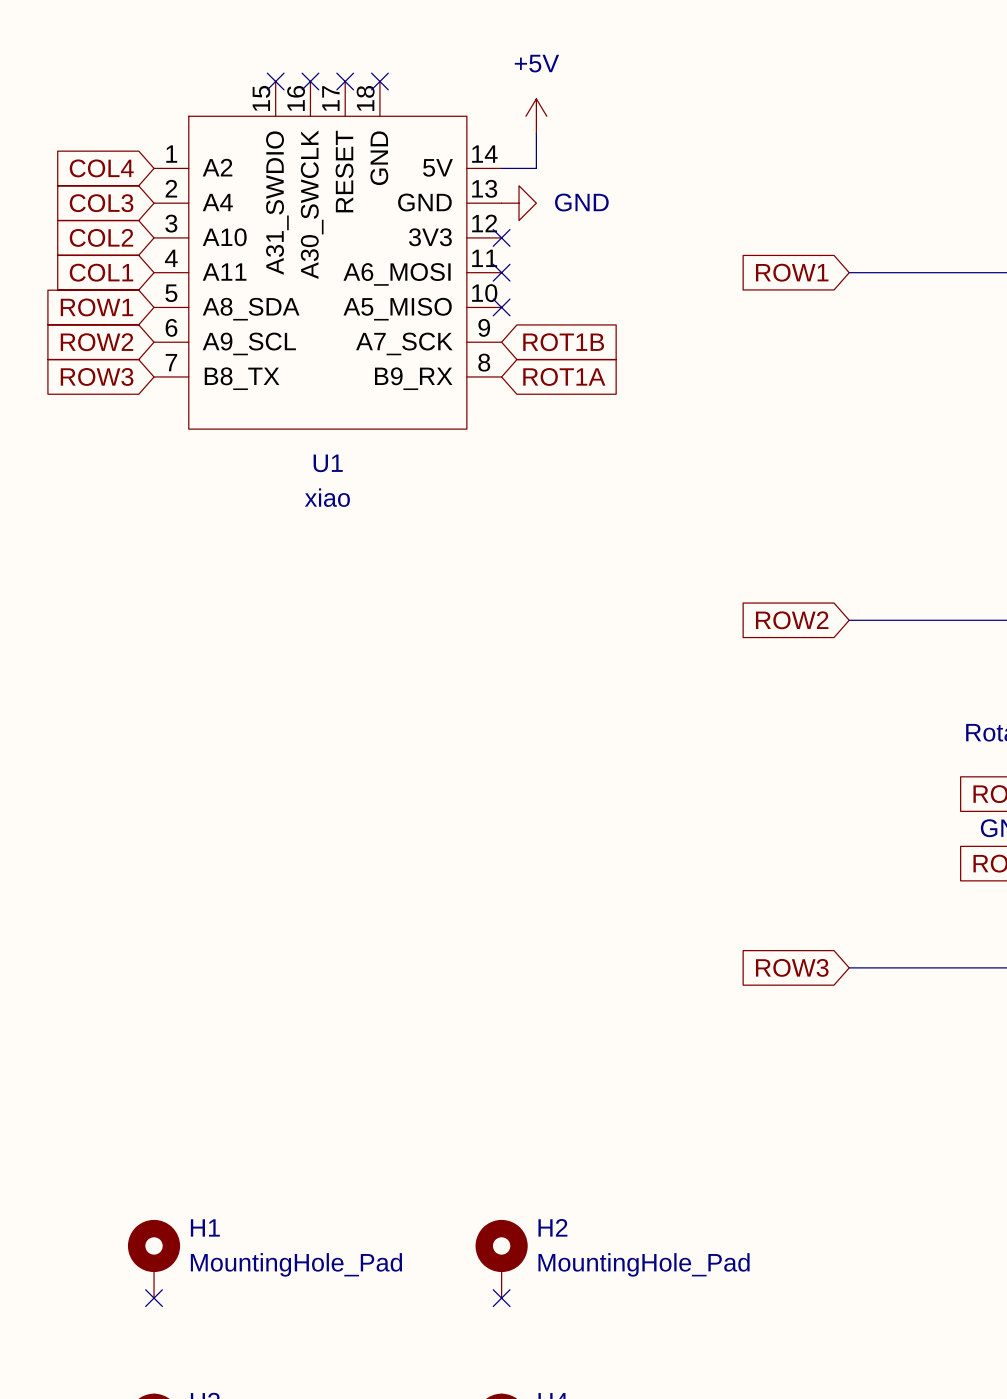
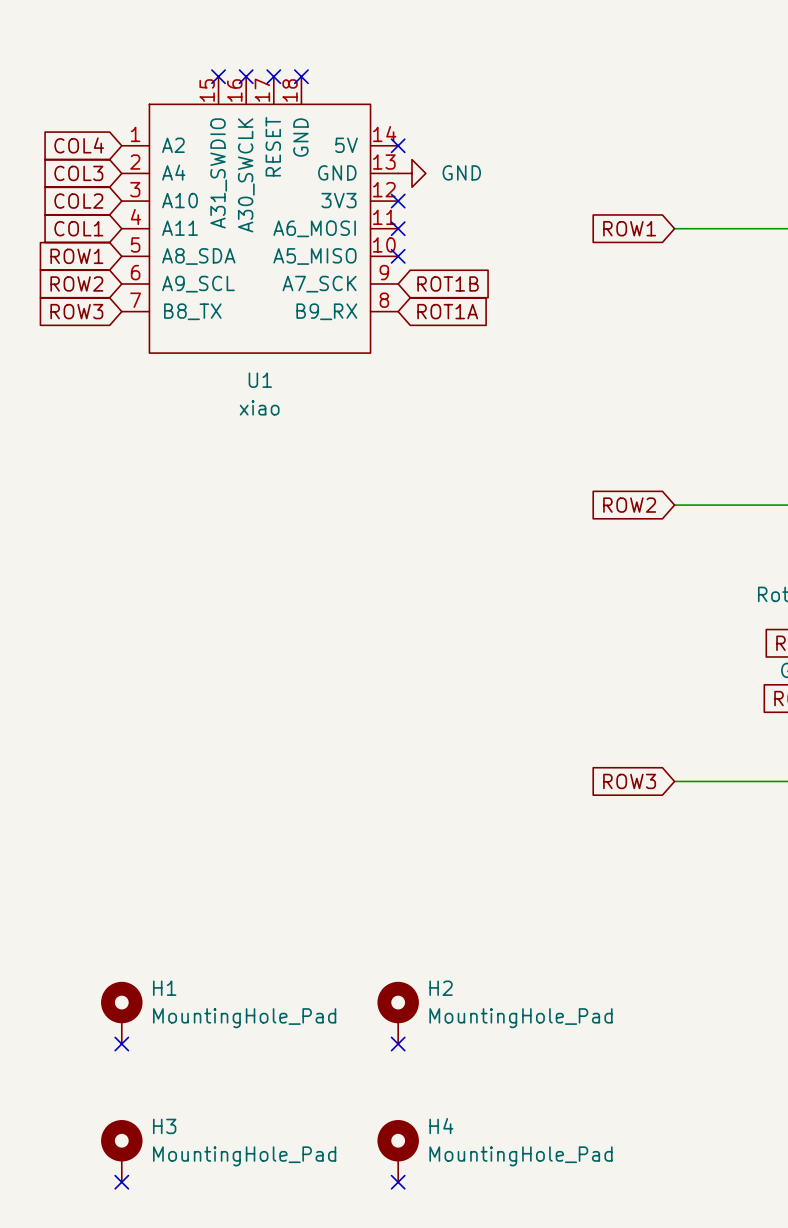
power symbol: +5V (536, 116) -> none
wire: (536, 133) (536, 168) (501, 168) -> none
no-connect mark: none -> (398, 145)

